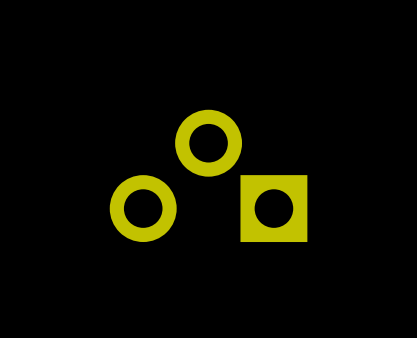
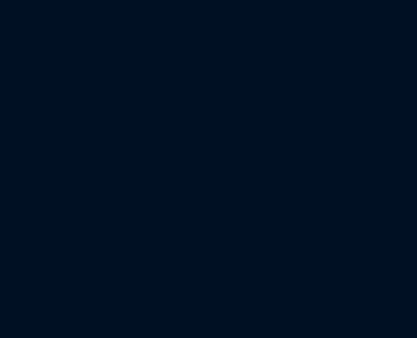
part: (208, 175) -> none

